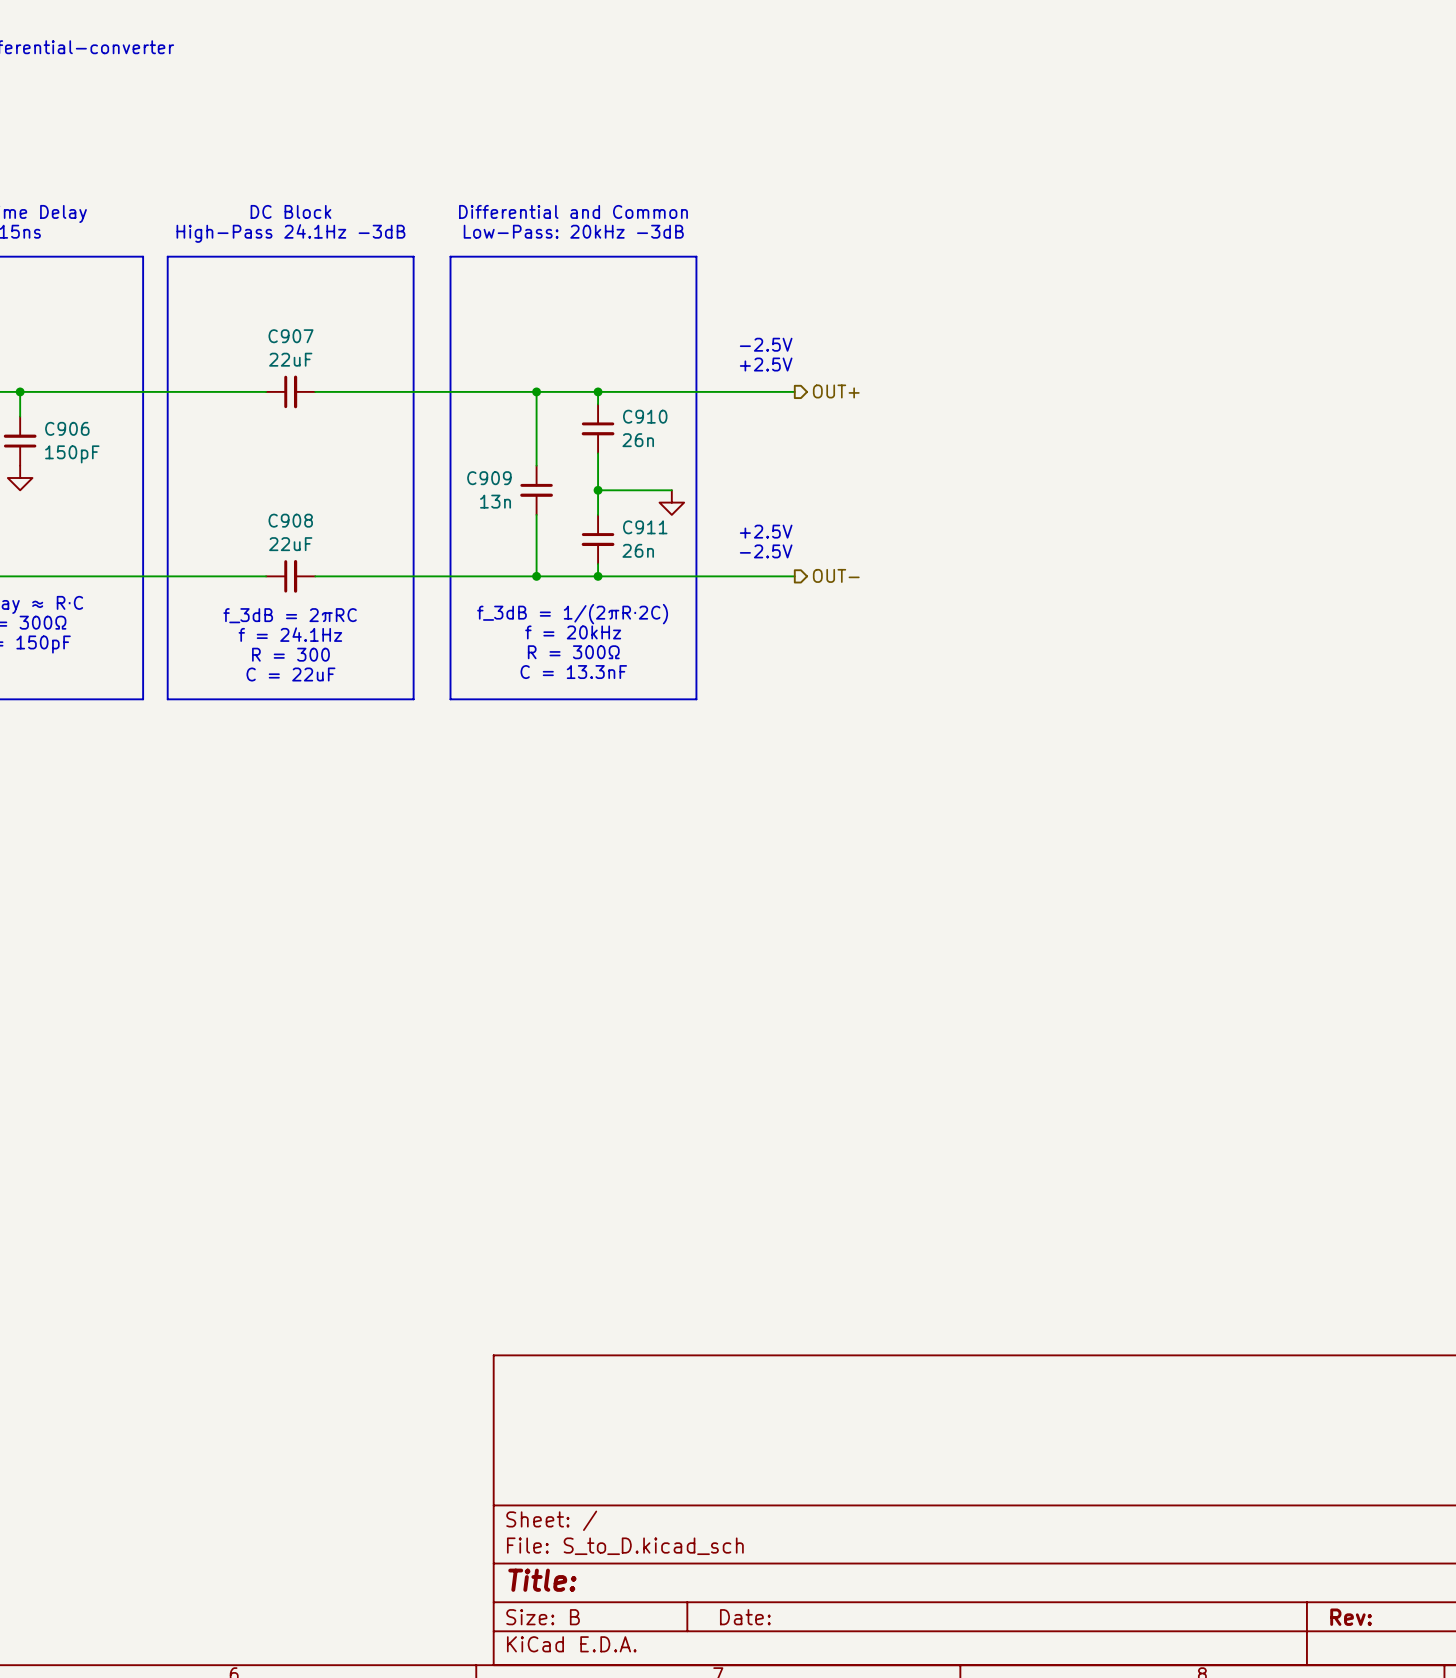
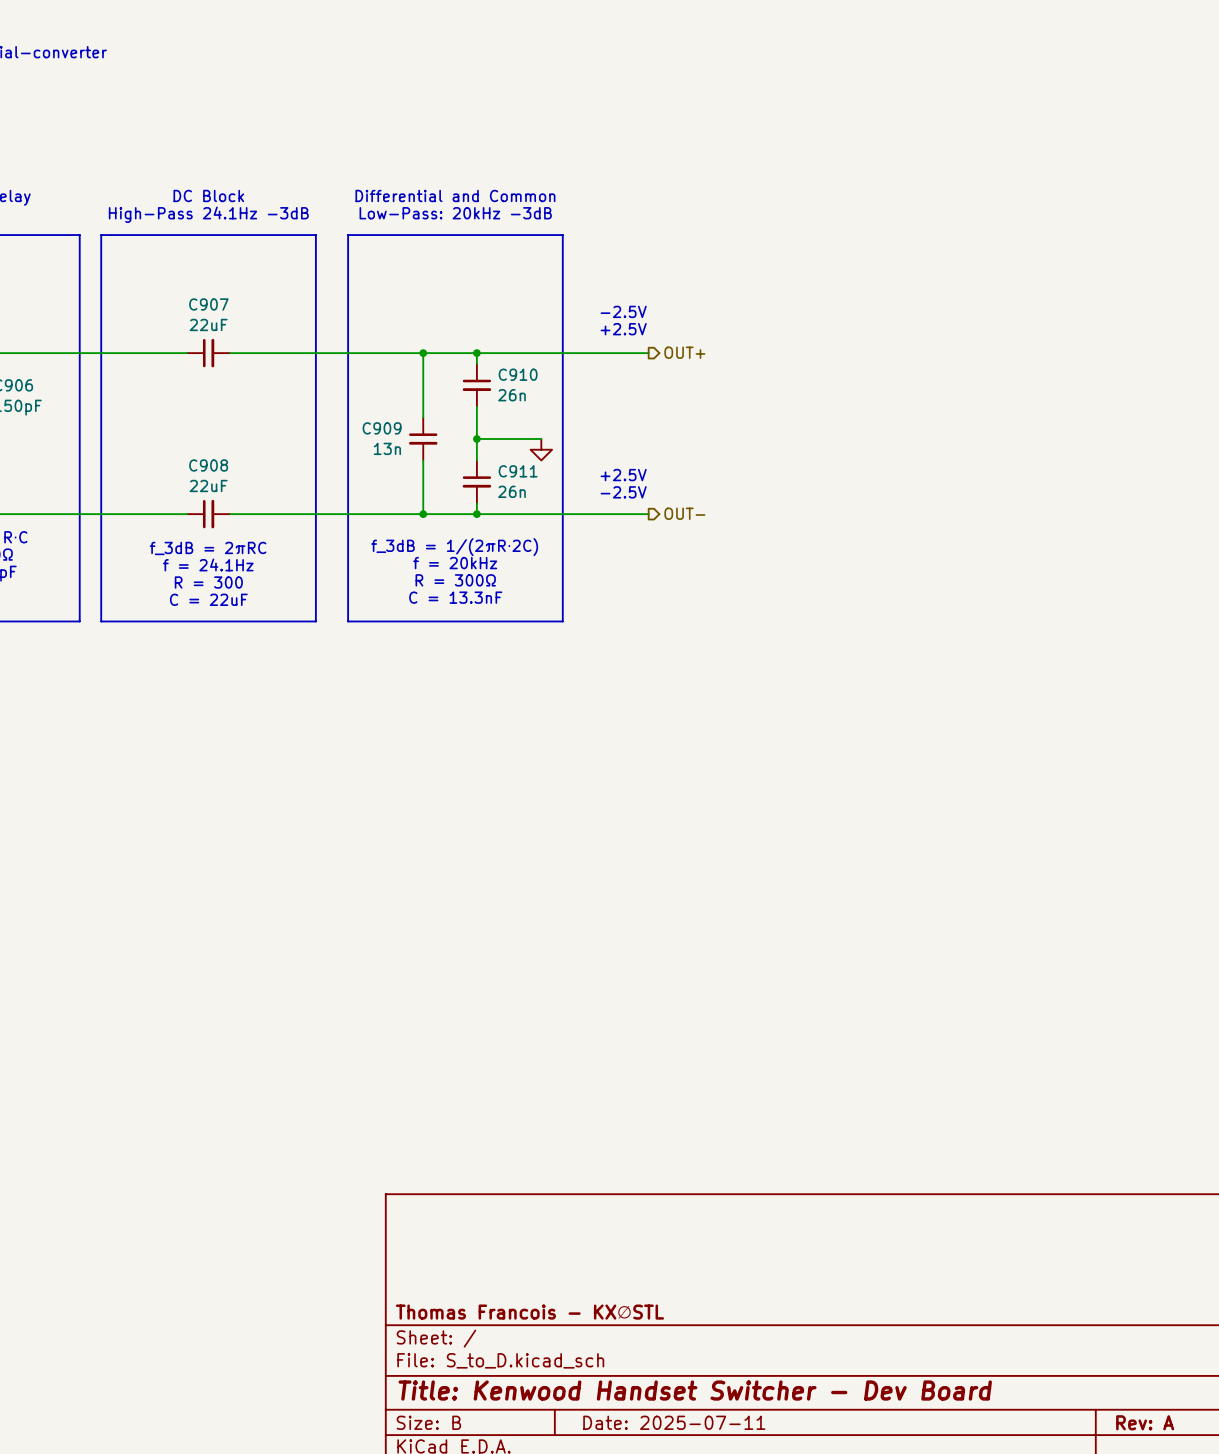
title block: none -> Thomas Francois - KX∅STL (529, 1312)
title block: Title: (542, 1580) -> Title: Kenwood Handset Switcher - Dev Board (695, 1390)
title block: Date: (745, 1617) -> Date: 2025-07-11 (674, 1422)
title block: Rev: (1351, 1617) -> Rev: A (1145, 1422)

